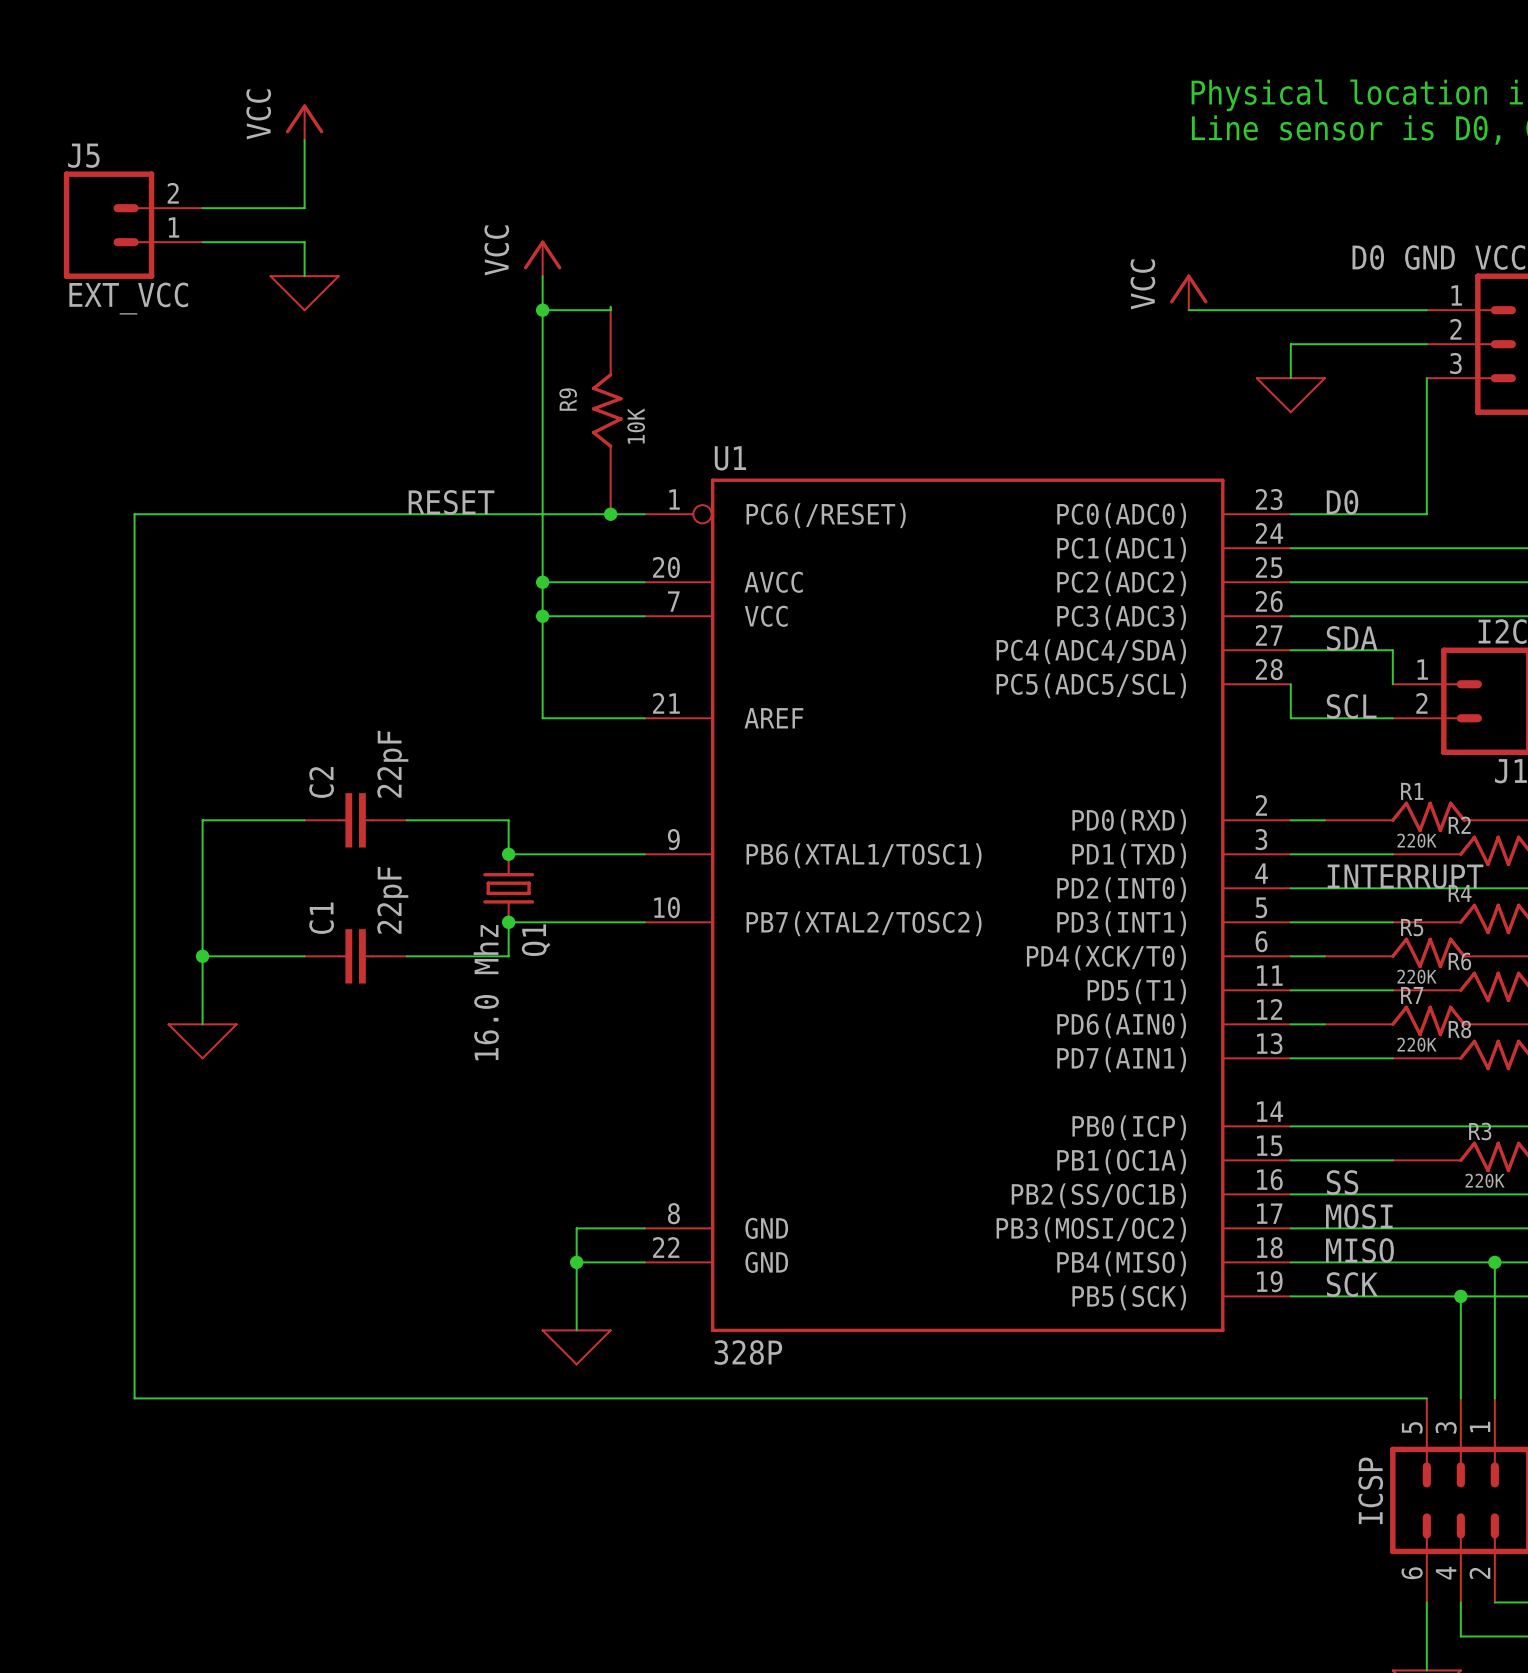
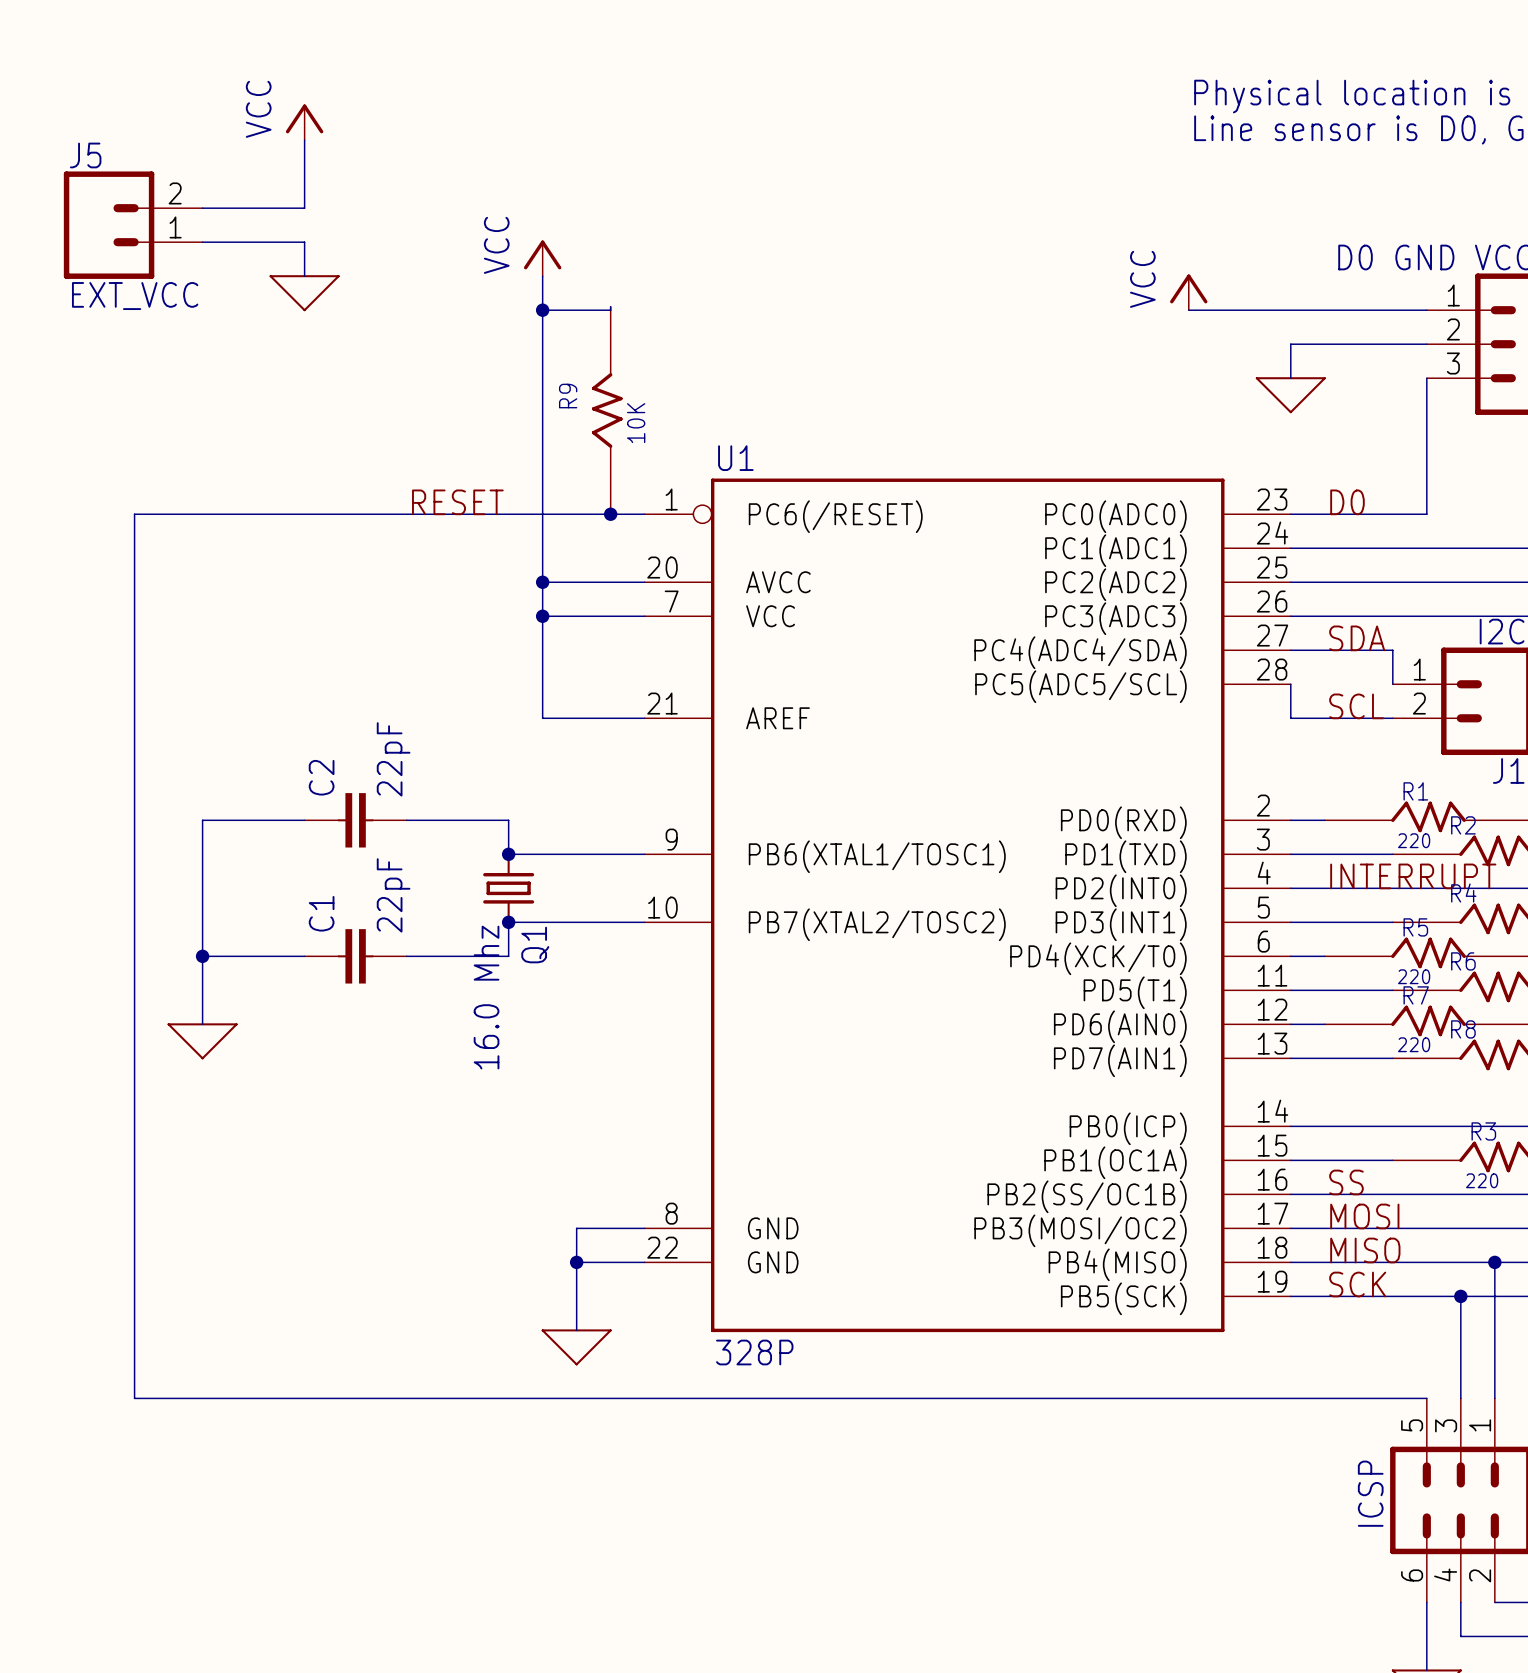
R1 value: 220K (1417, 840) -> 220 (1414, 840)
R5 value: 220K (1417, 976) -> 220 (1414, 976)
R7 value: 220K (1417, 1044) -> 220 (1414, 1044)
R3 value: 220K (1485, 1180) -> 220 (1482, 1180)

